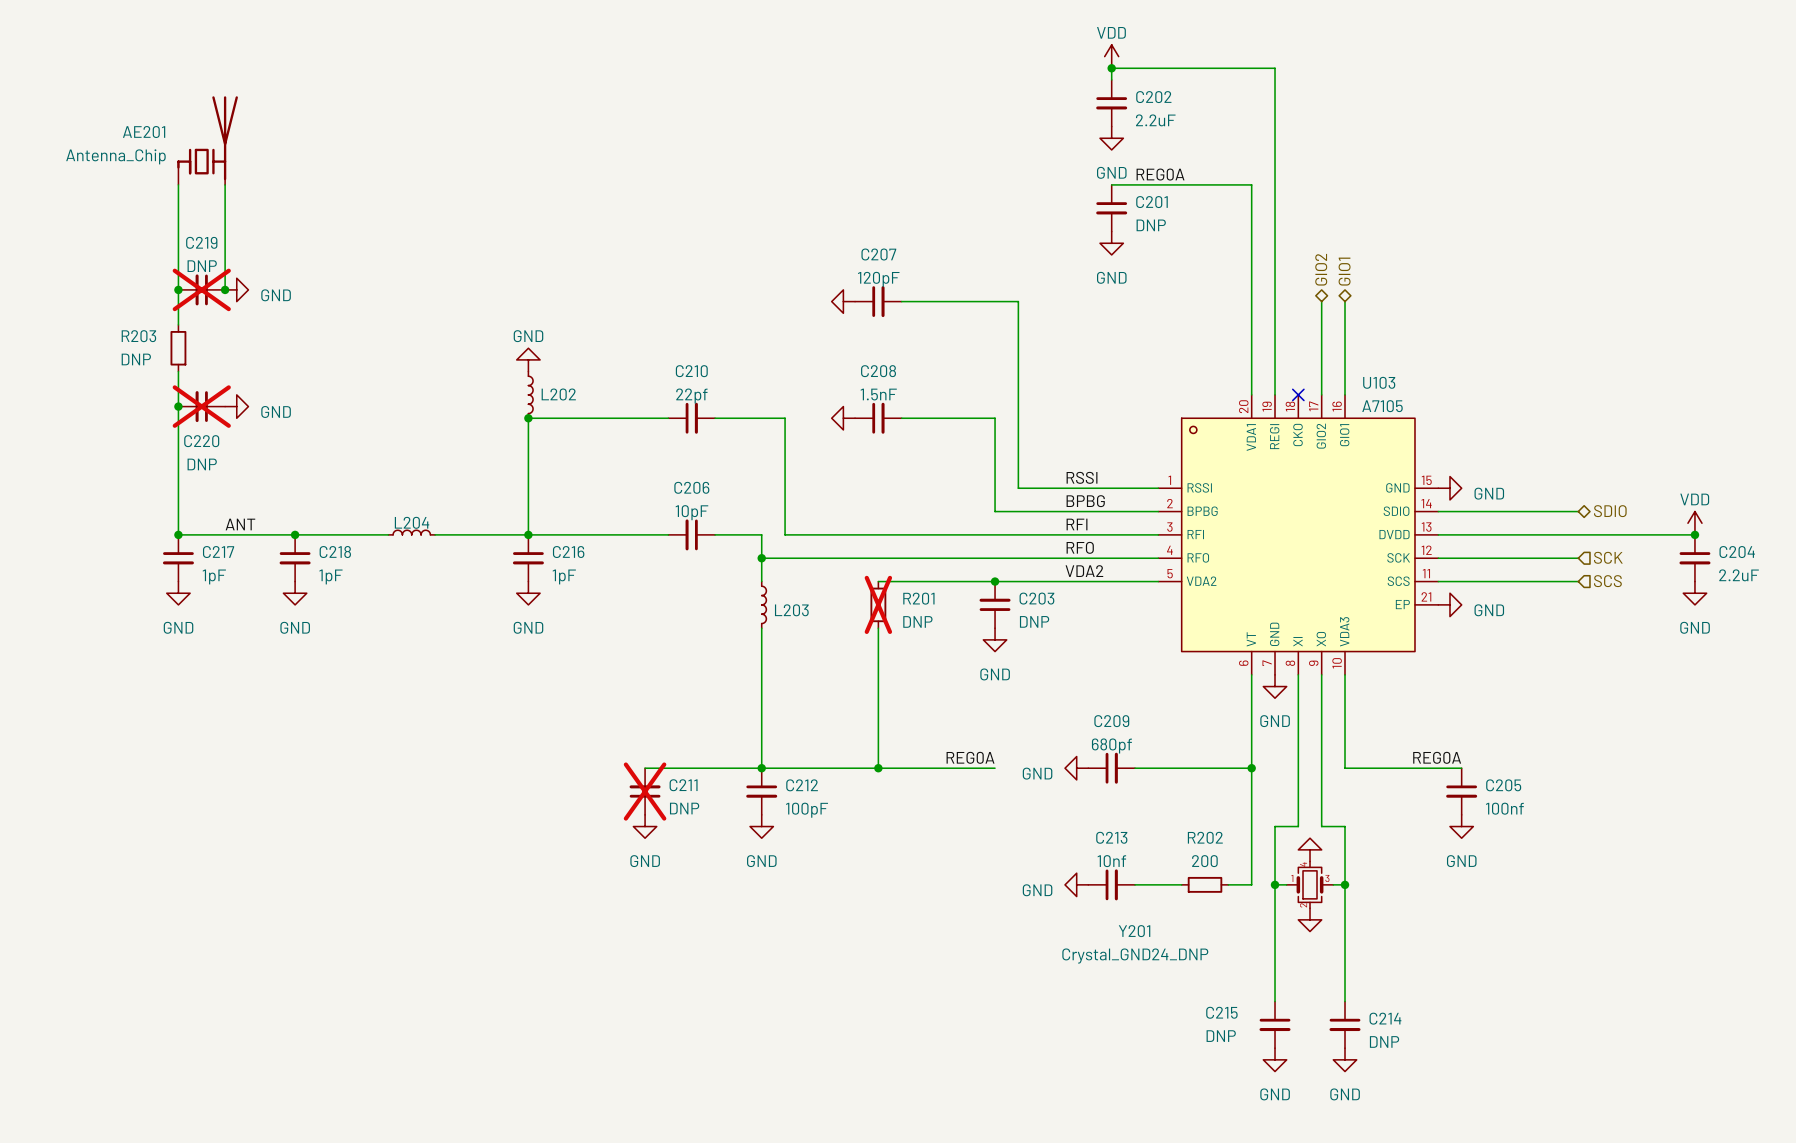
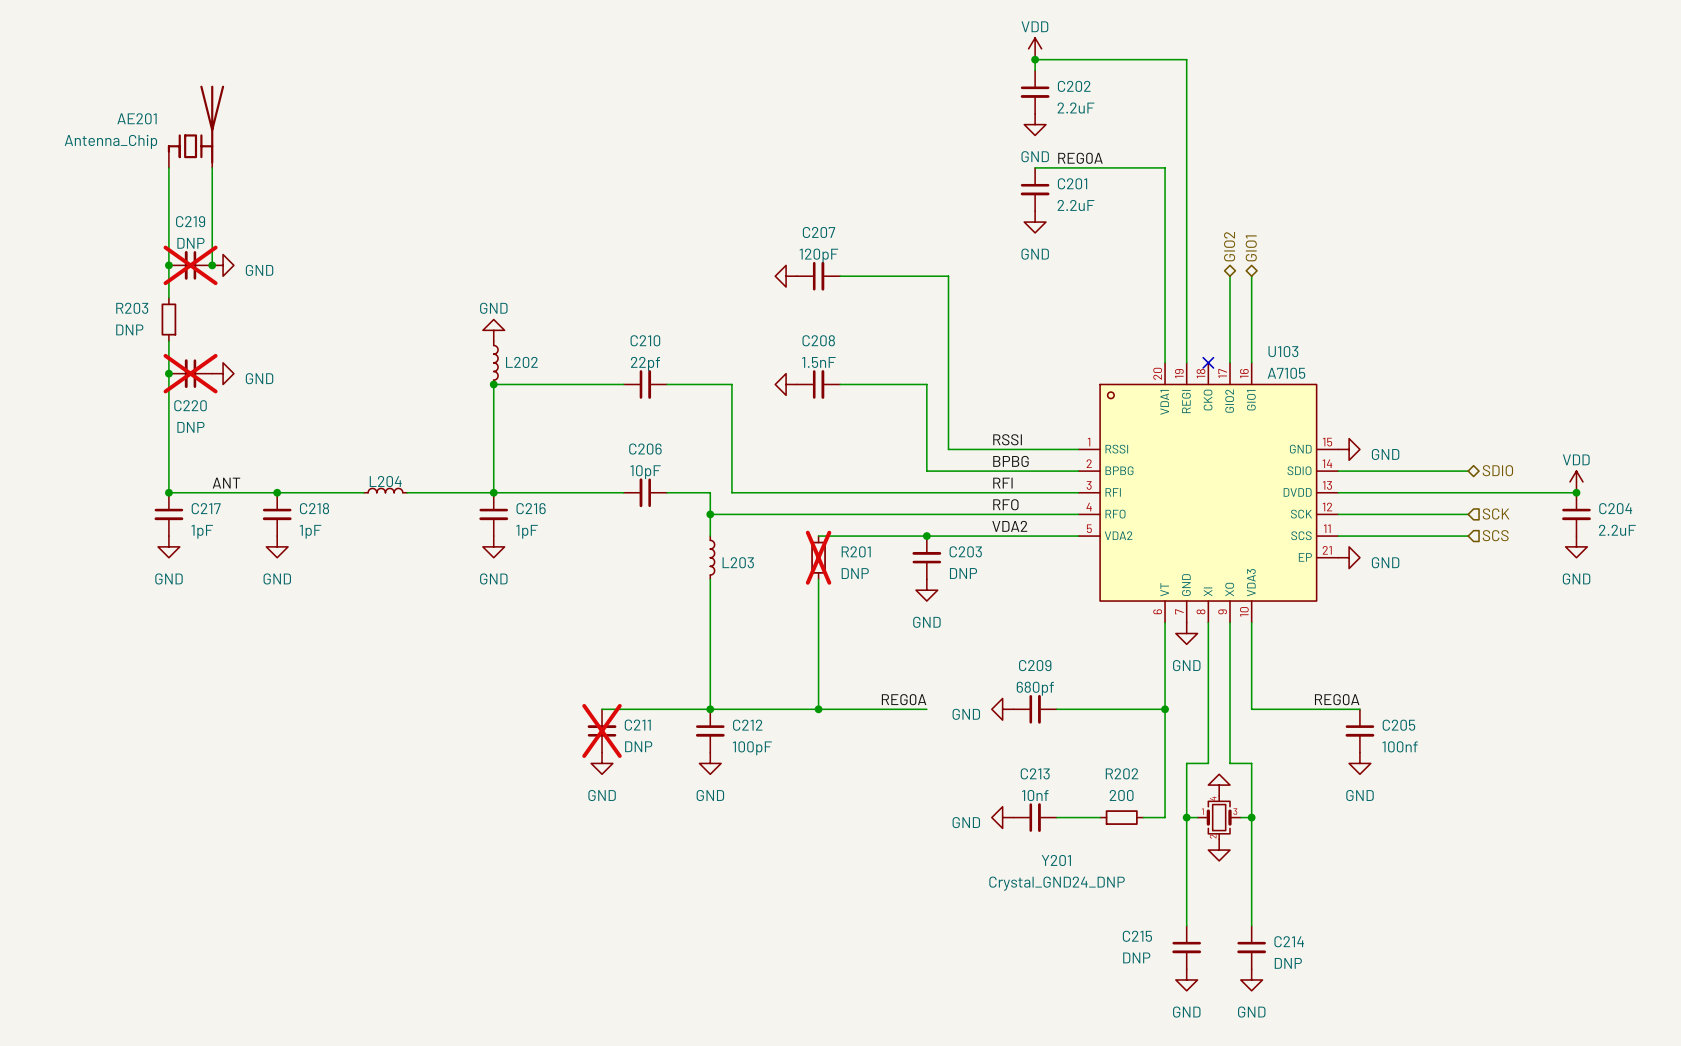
C201 text: DNP (1151, 225) -> 2.2uF (1076, 205)

